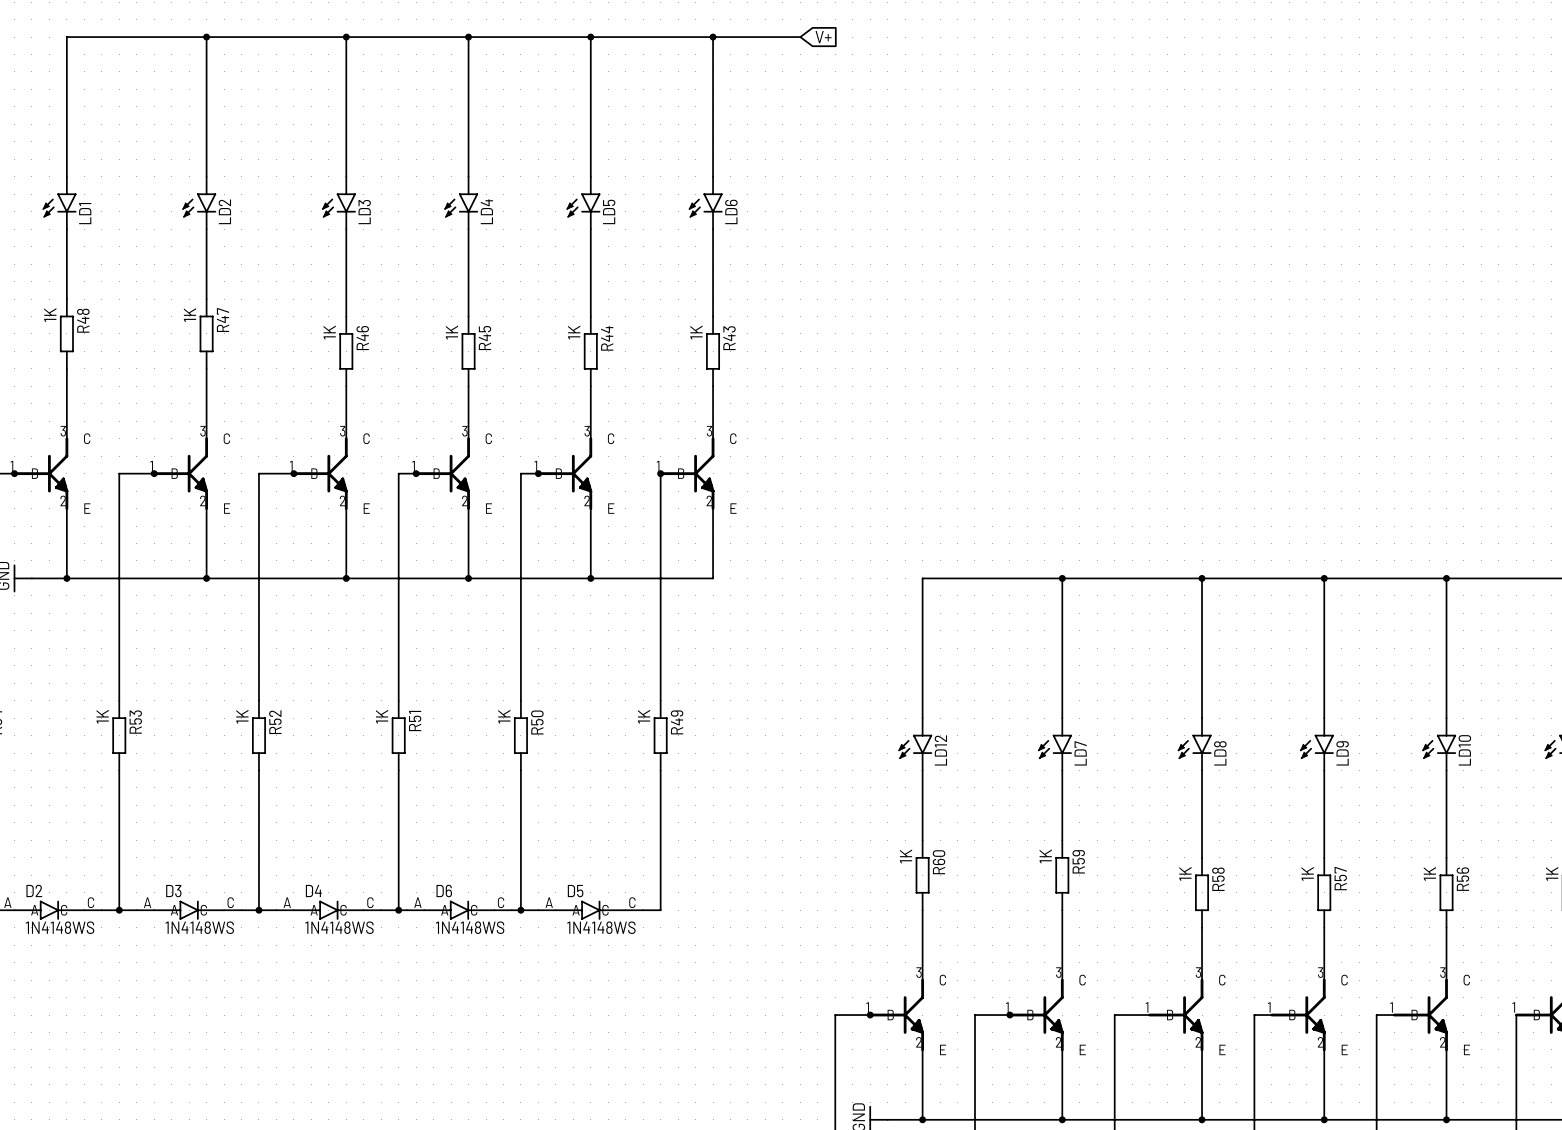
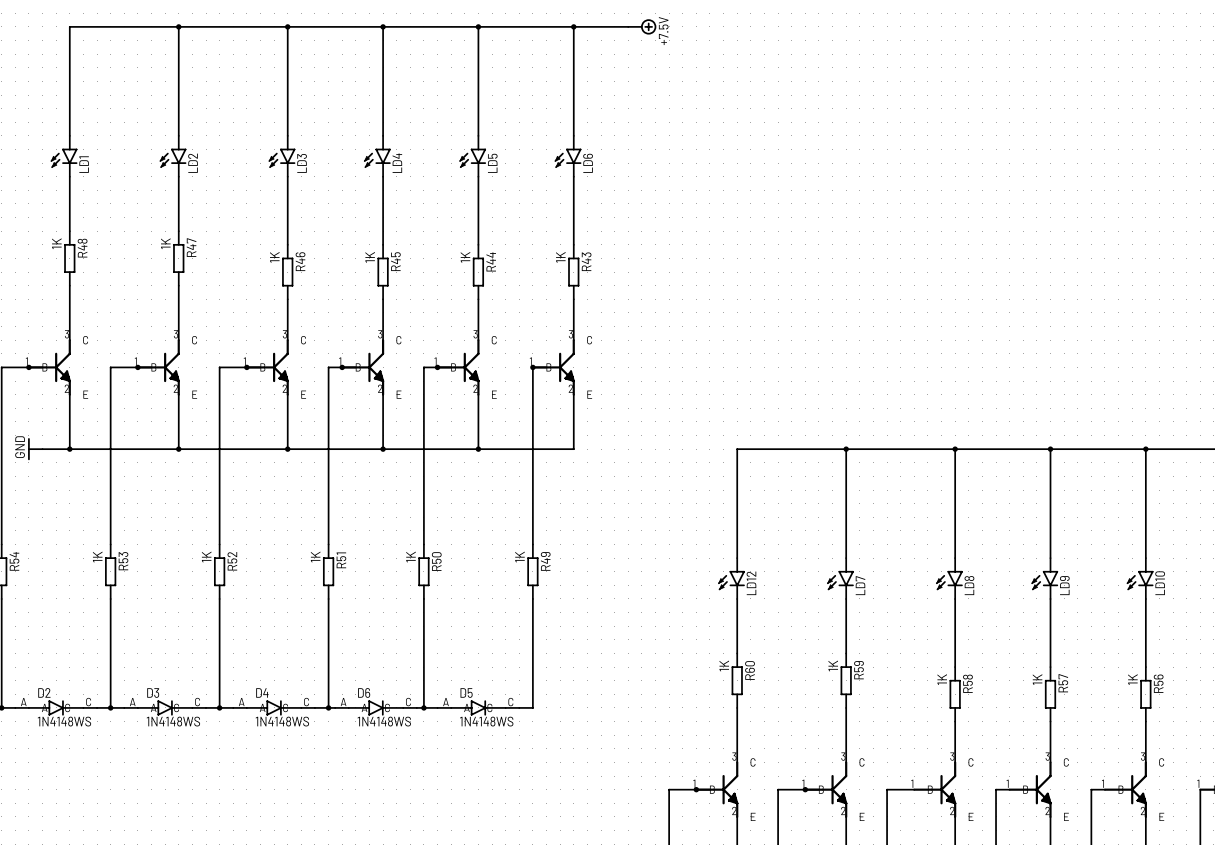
power symbol: none -> +7.5V (642, 26)
global label: V+ (823, 37) -> none

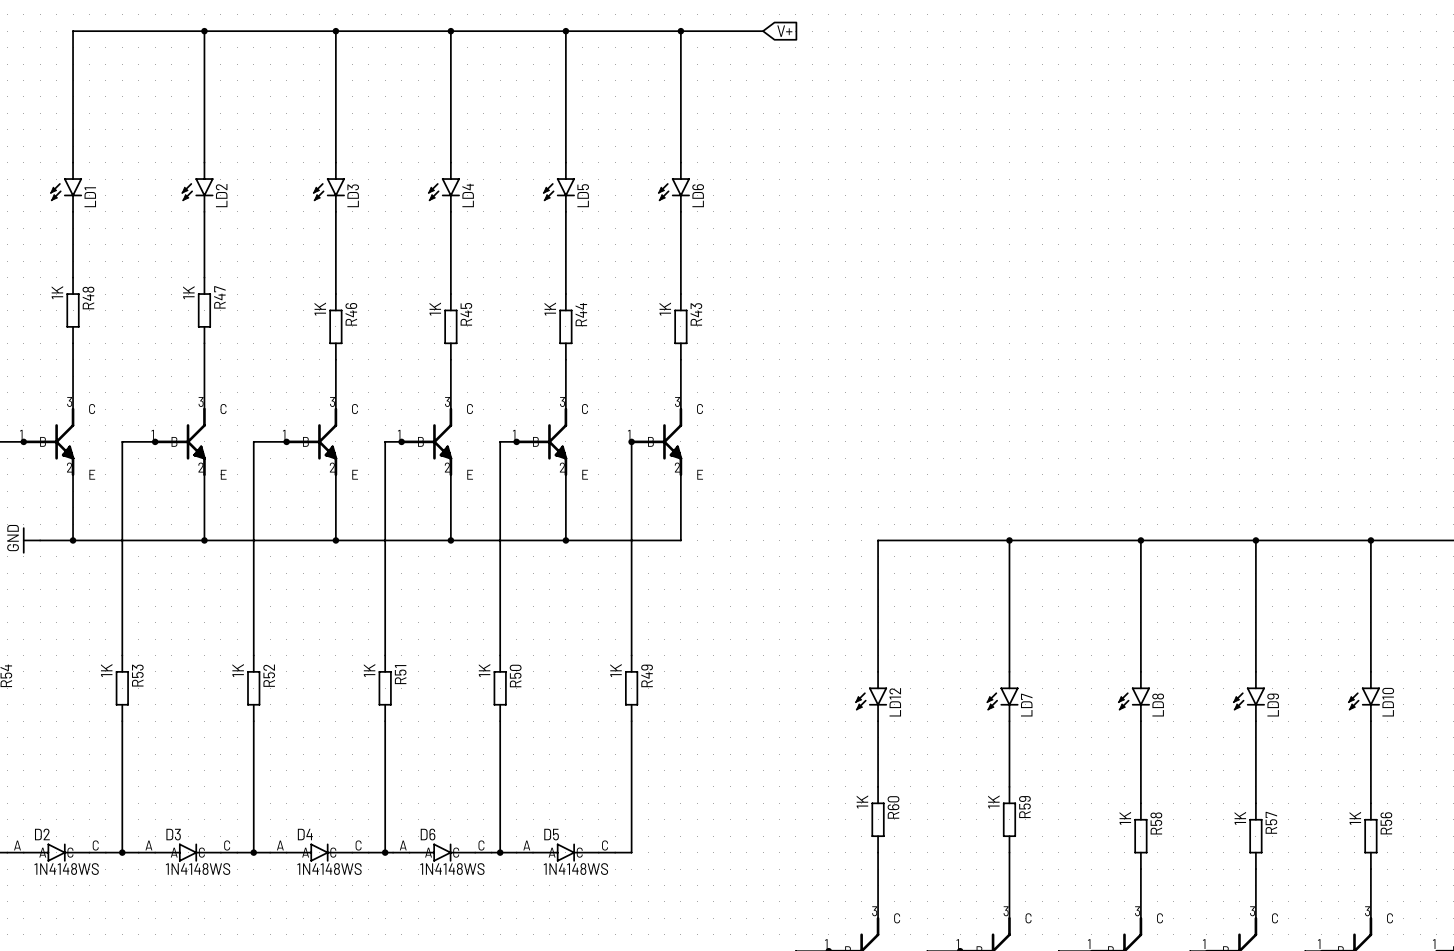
power symbol: +7.5V (642, 26) -> none
global label: none -> V+ (784, 31)

